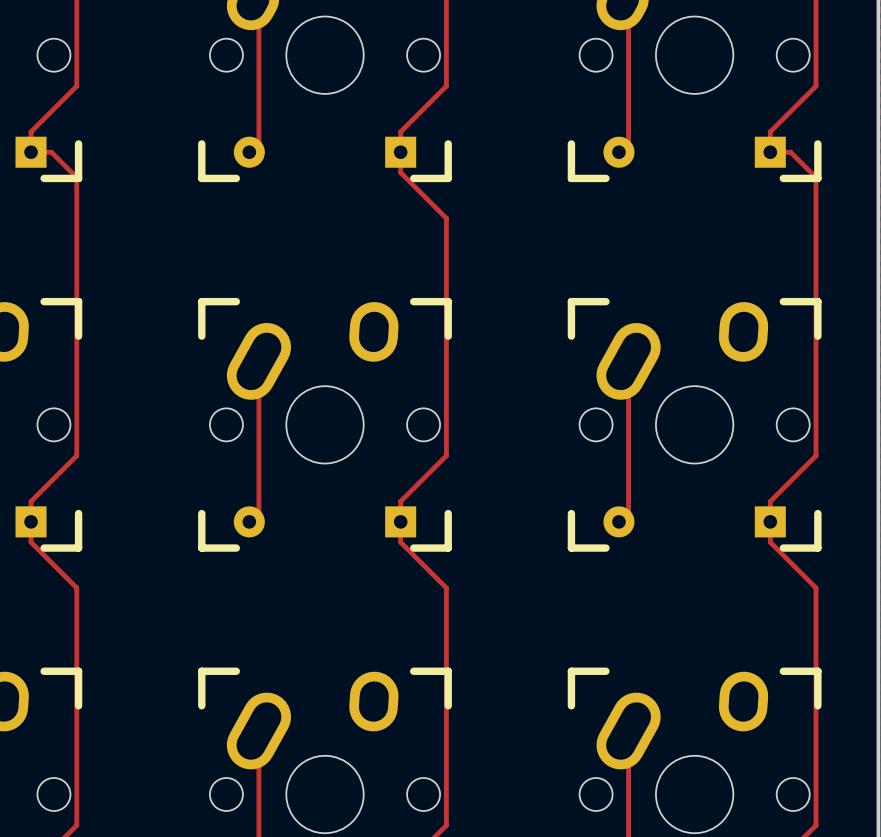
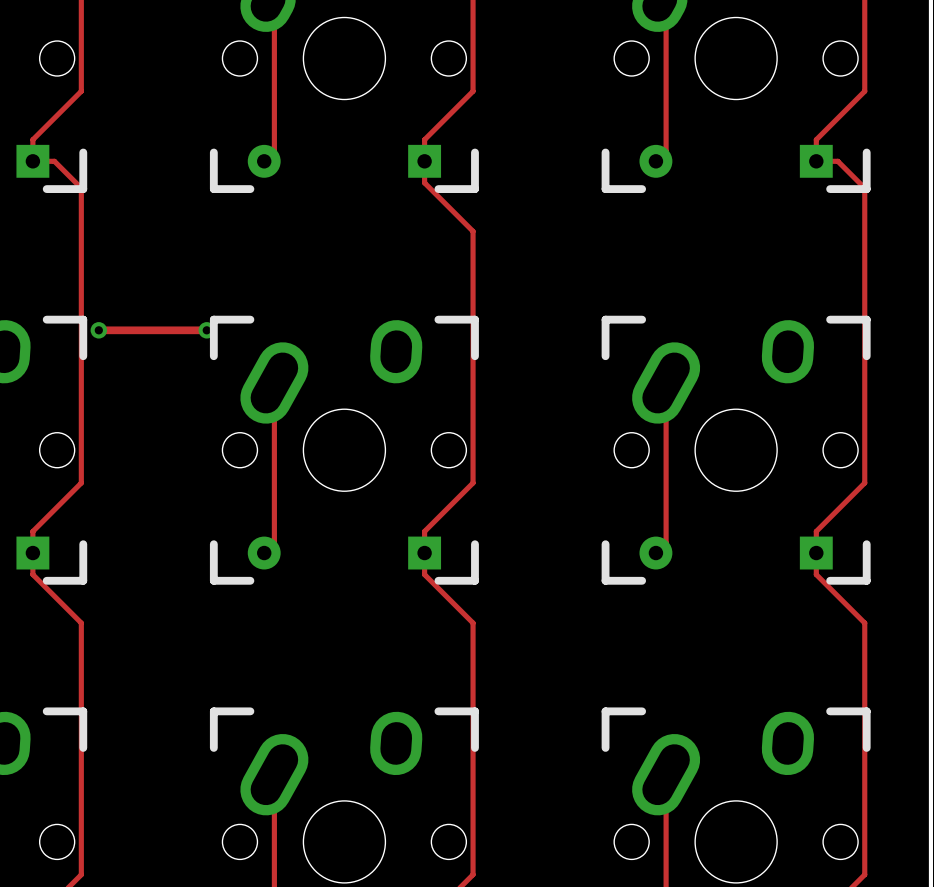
track: none -> (98, 330) (206, 330)
via: none -> (98, 330)
via: none -> (206, 330)

